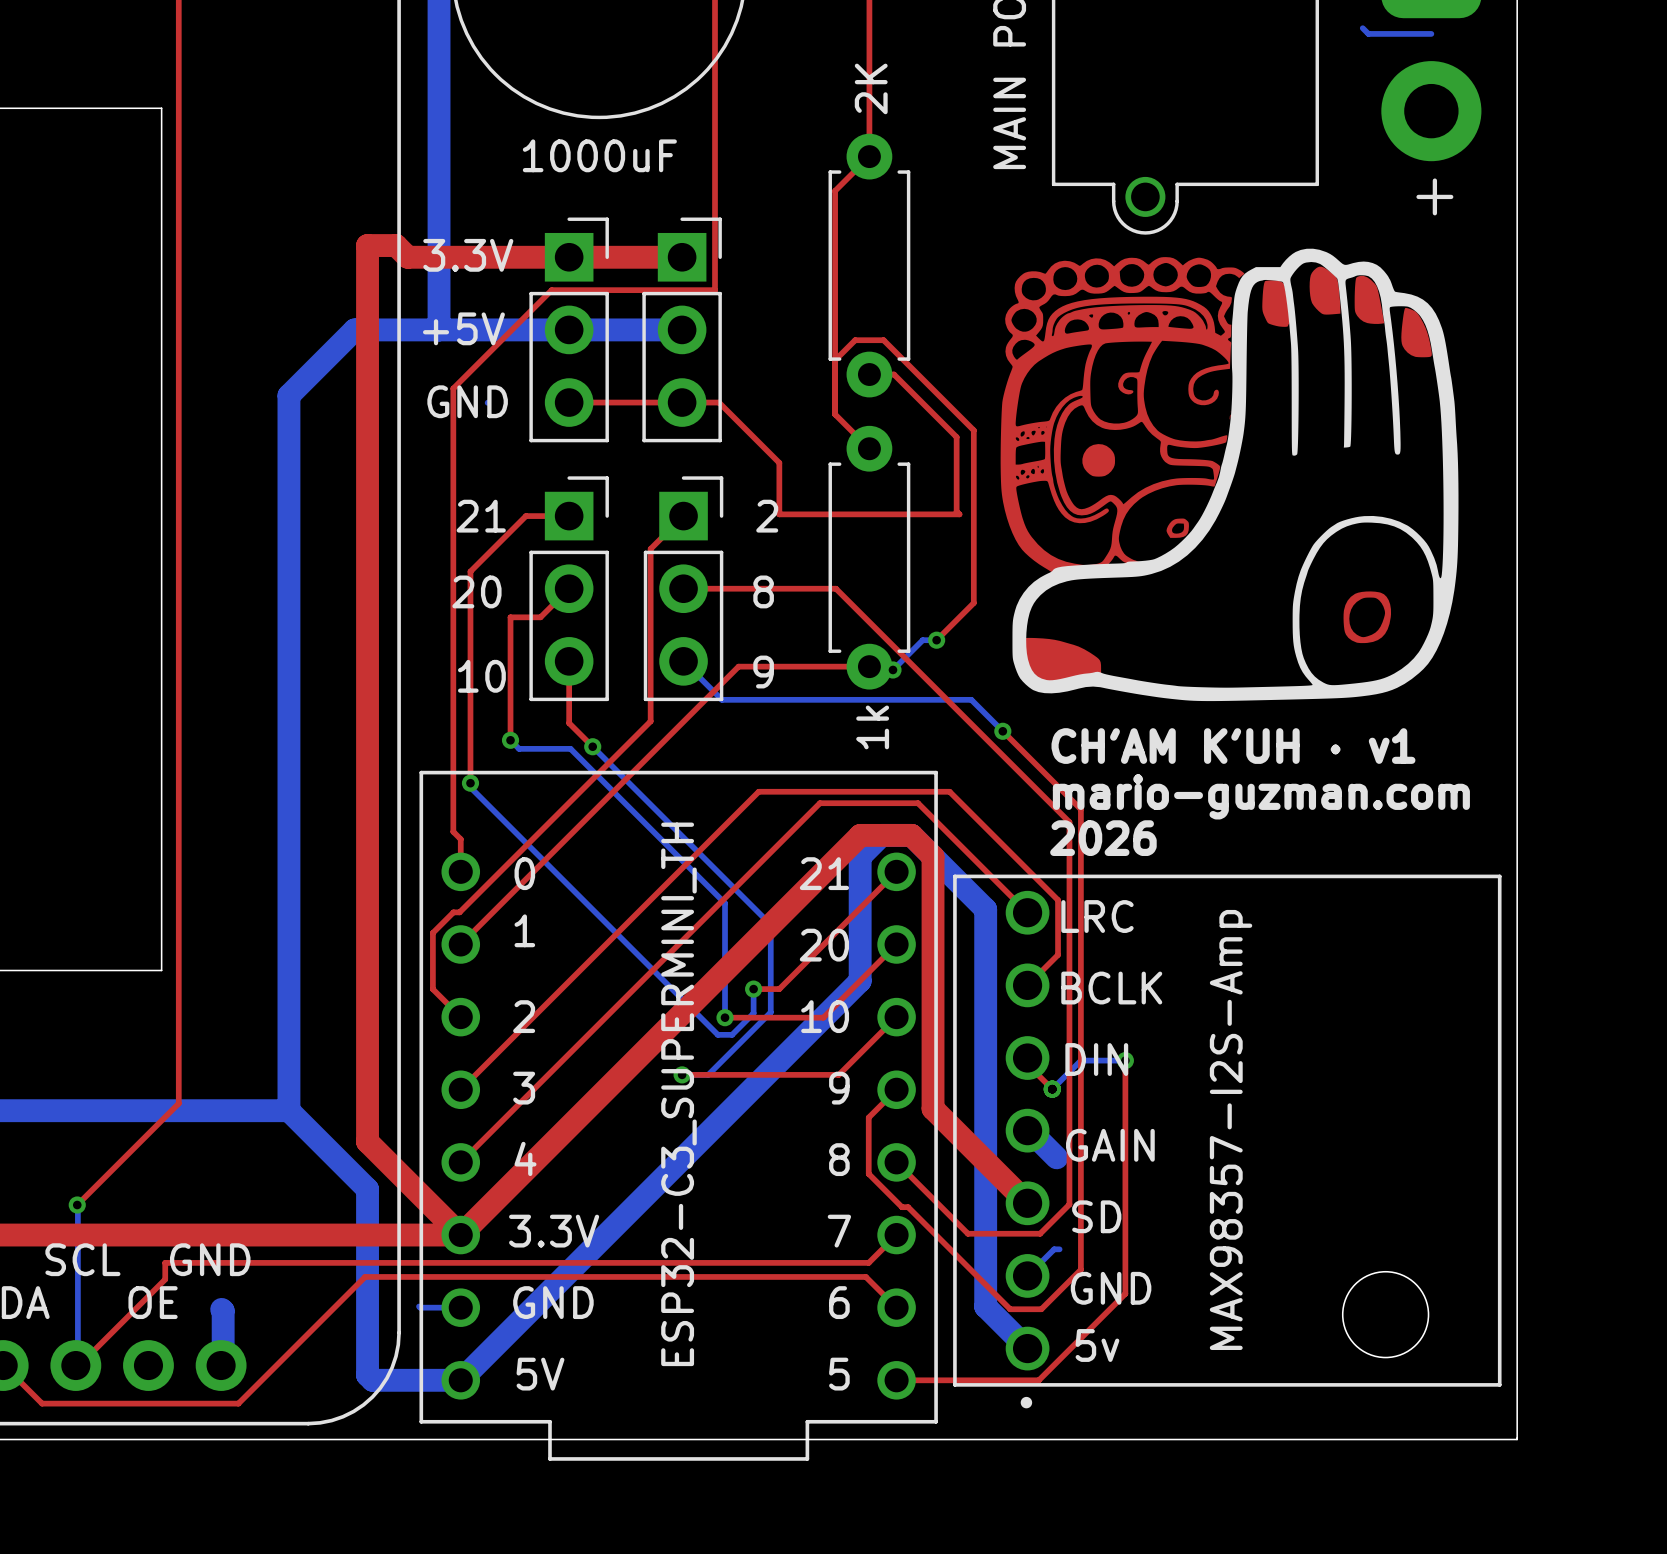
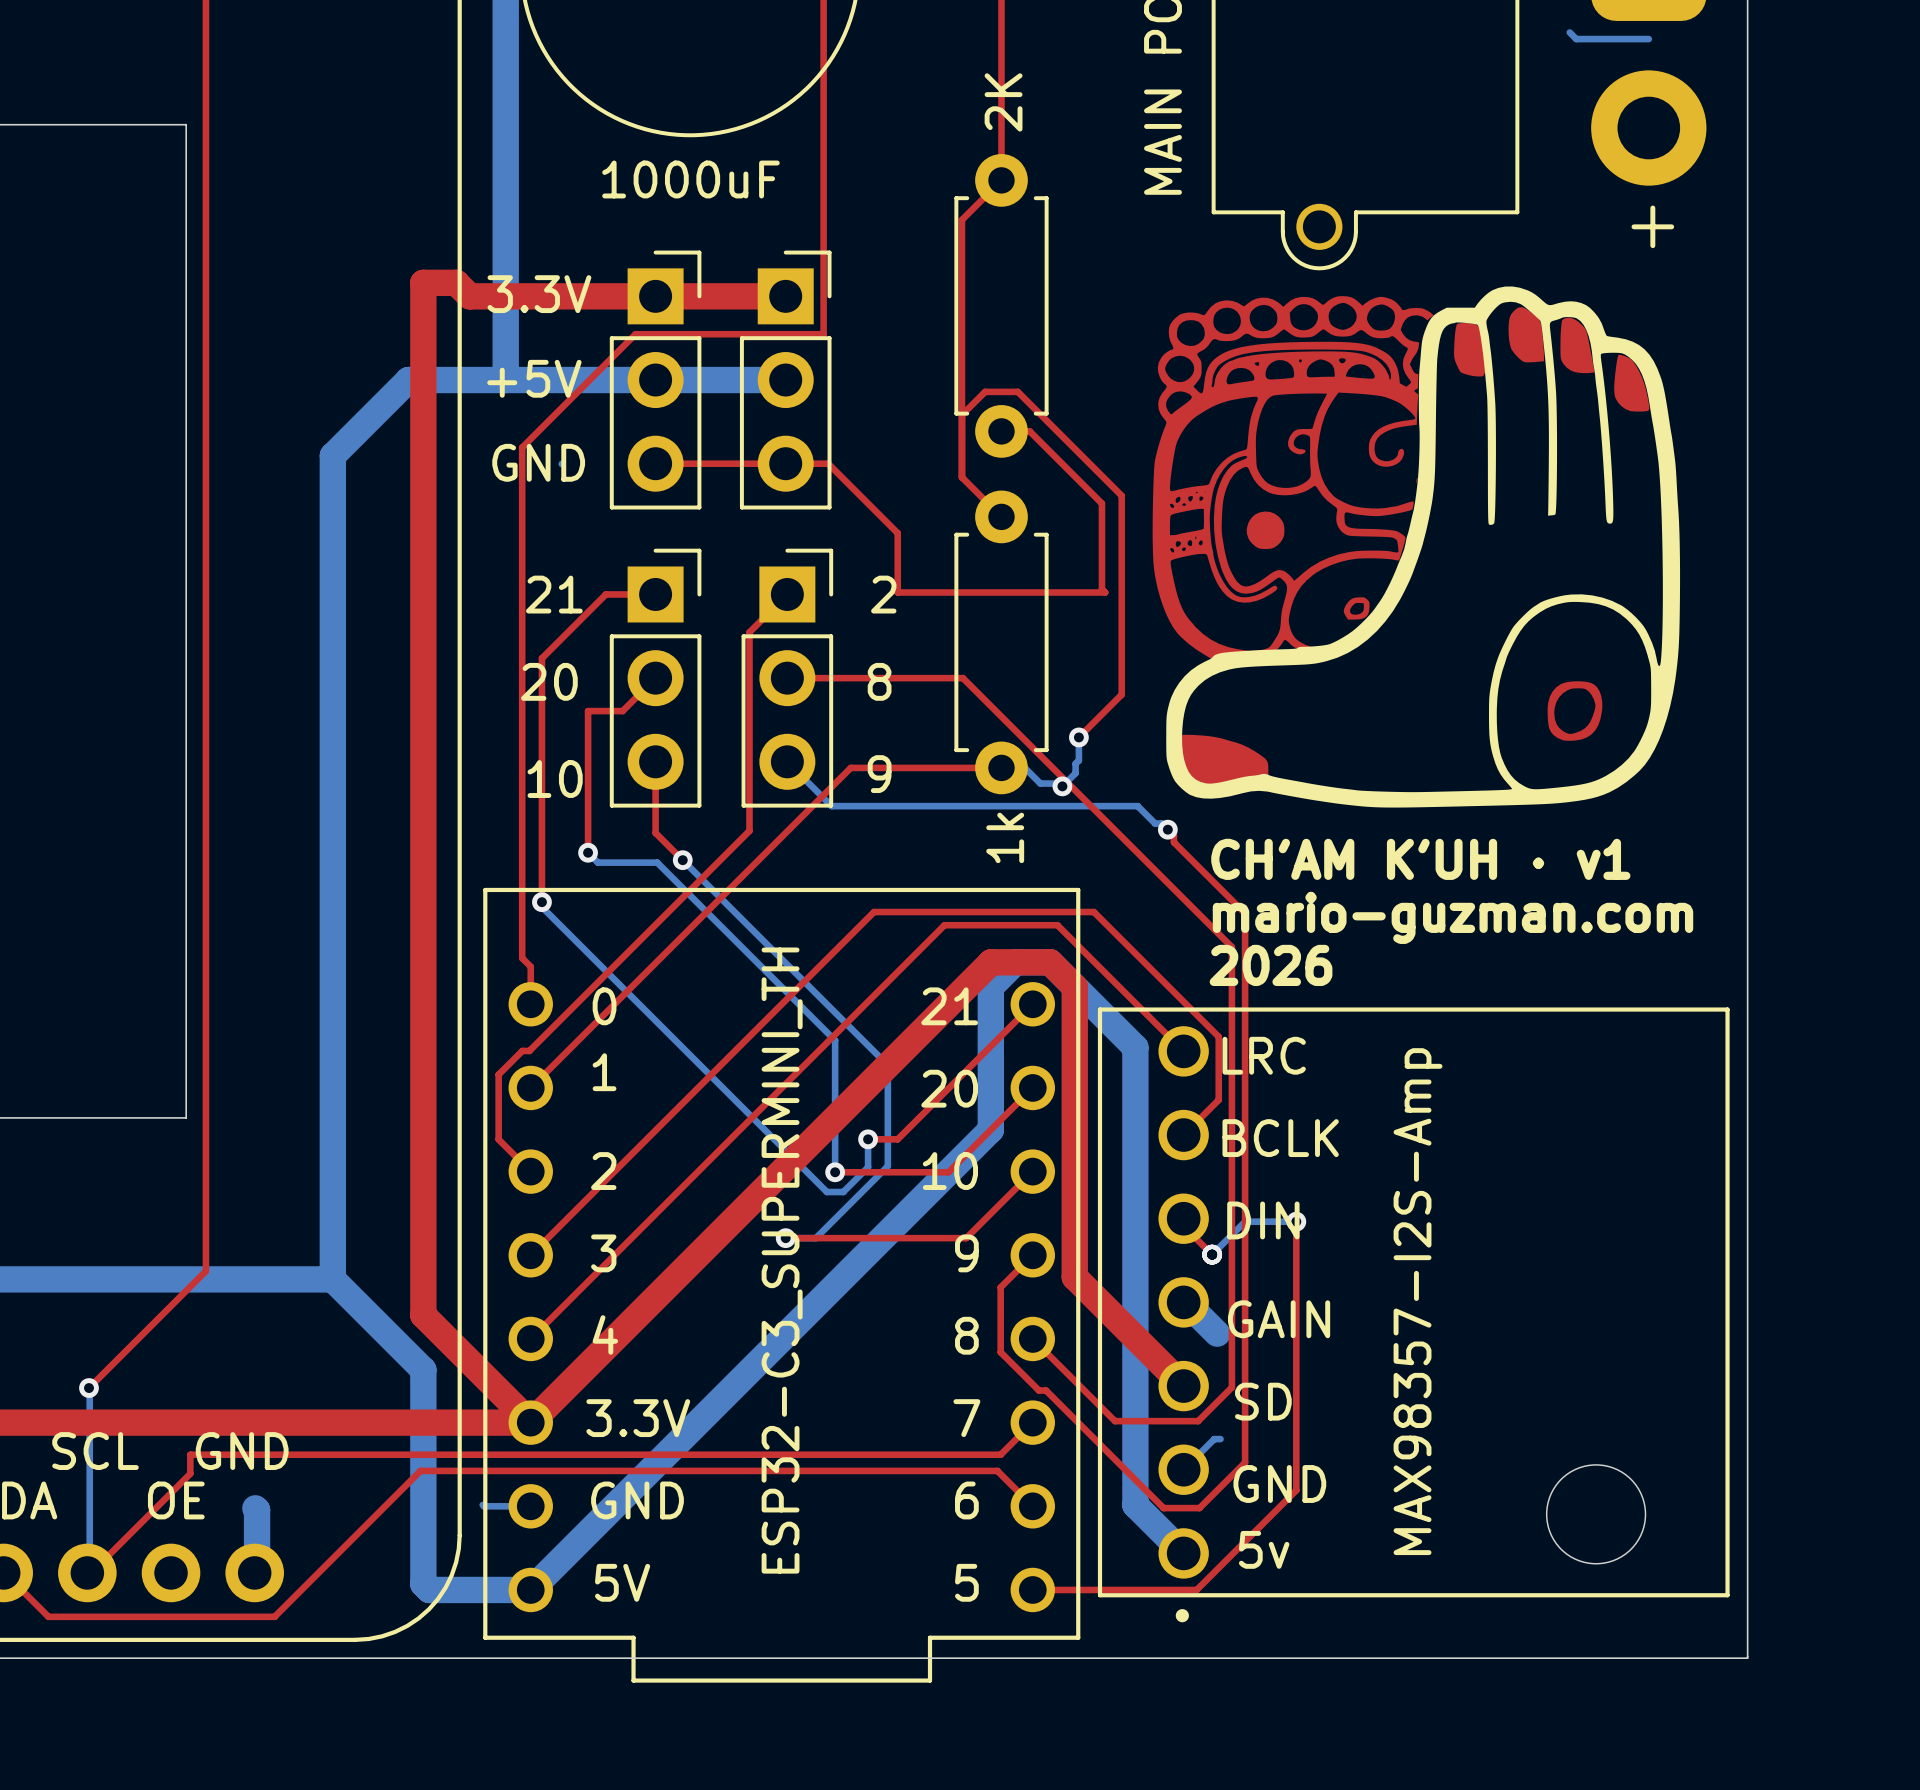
bottom track: (936, 640) (922, 640) (892, 669) -> (1078, 737) (1078, 760) (1075, 763) (1075, 773) (1062, 786) (1059, 783) (1040, 783) (1028, 771)
via position: (892, 669) -> (1062, 786)
bottom track: (971, 699) (1002, 731) -> (1118, 806) (1137, 806) (1155, 823) (1161, 823) (1167, 829)
top track: (1002, 731) (1080, 809) -> (1167, 829) (1173, 835) (1173, 842) (1245, 913) (1245, 932)
via position: (1002, 731) -> (1167, 829)

